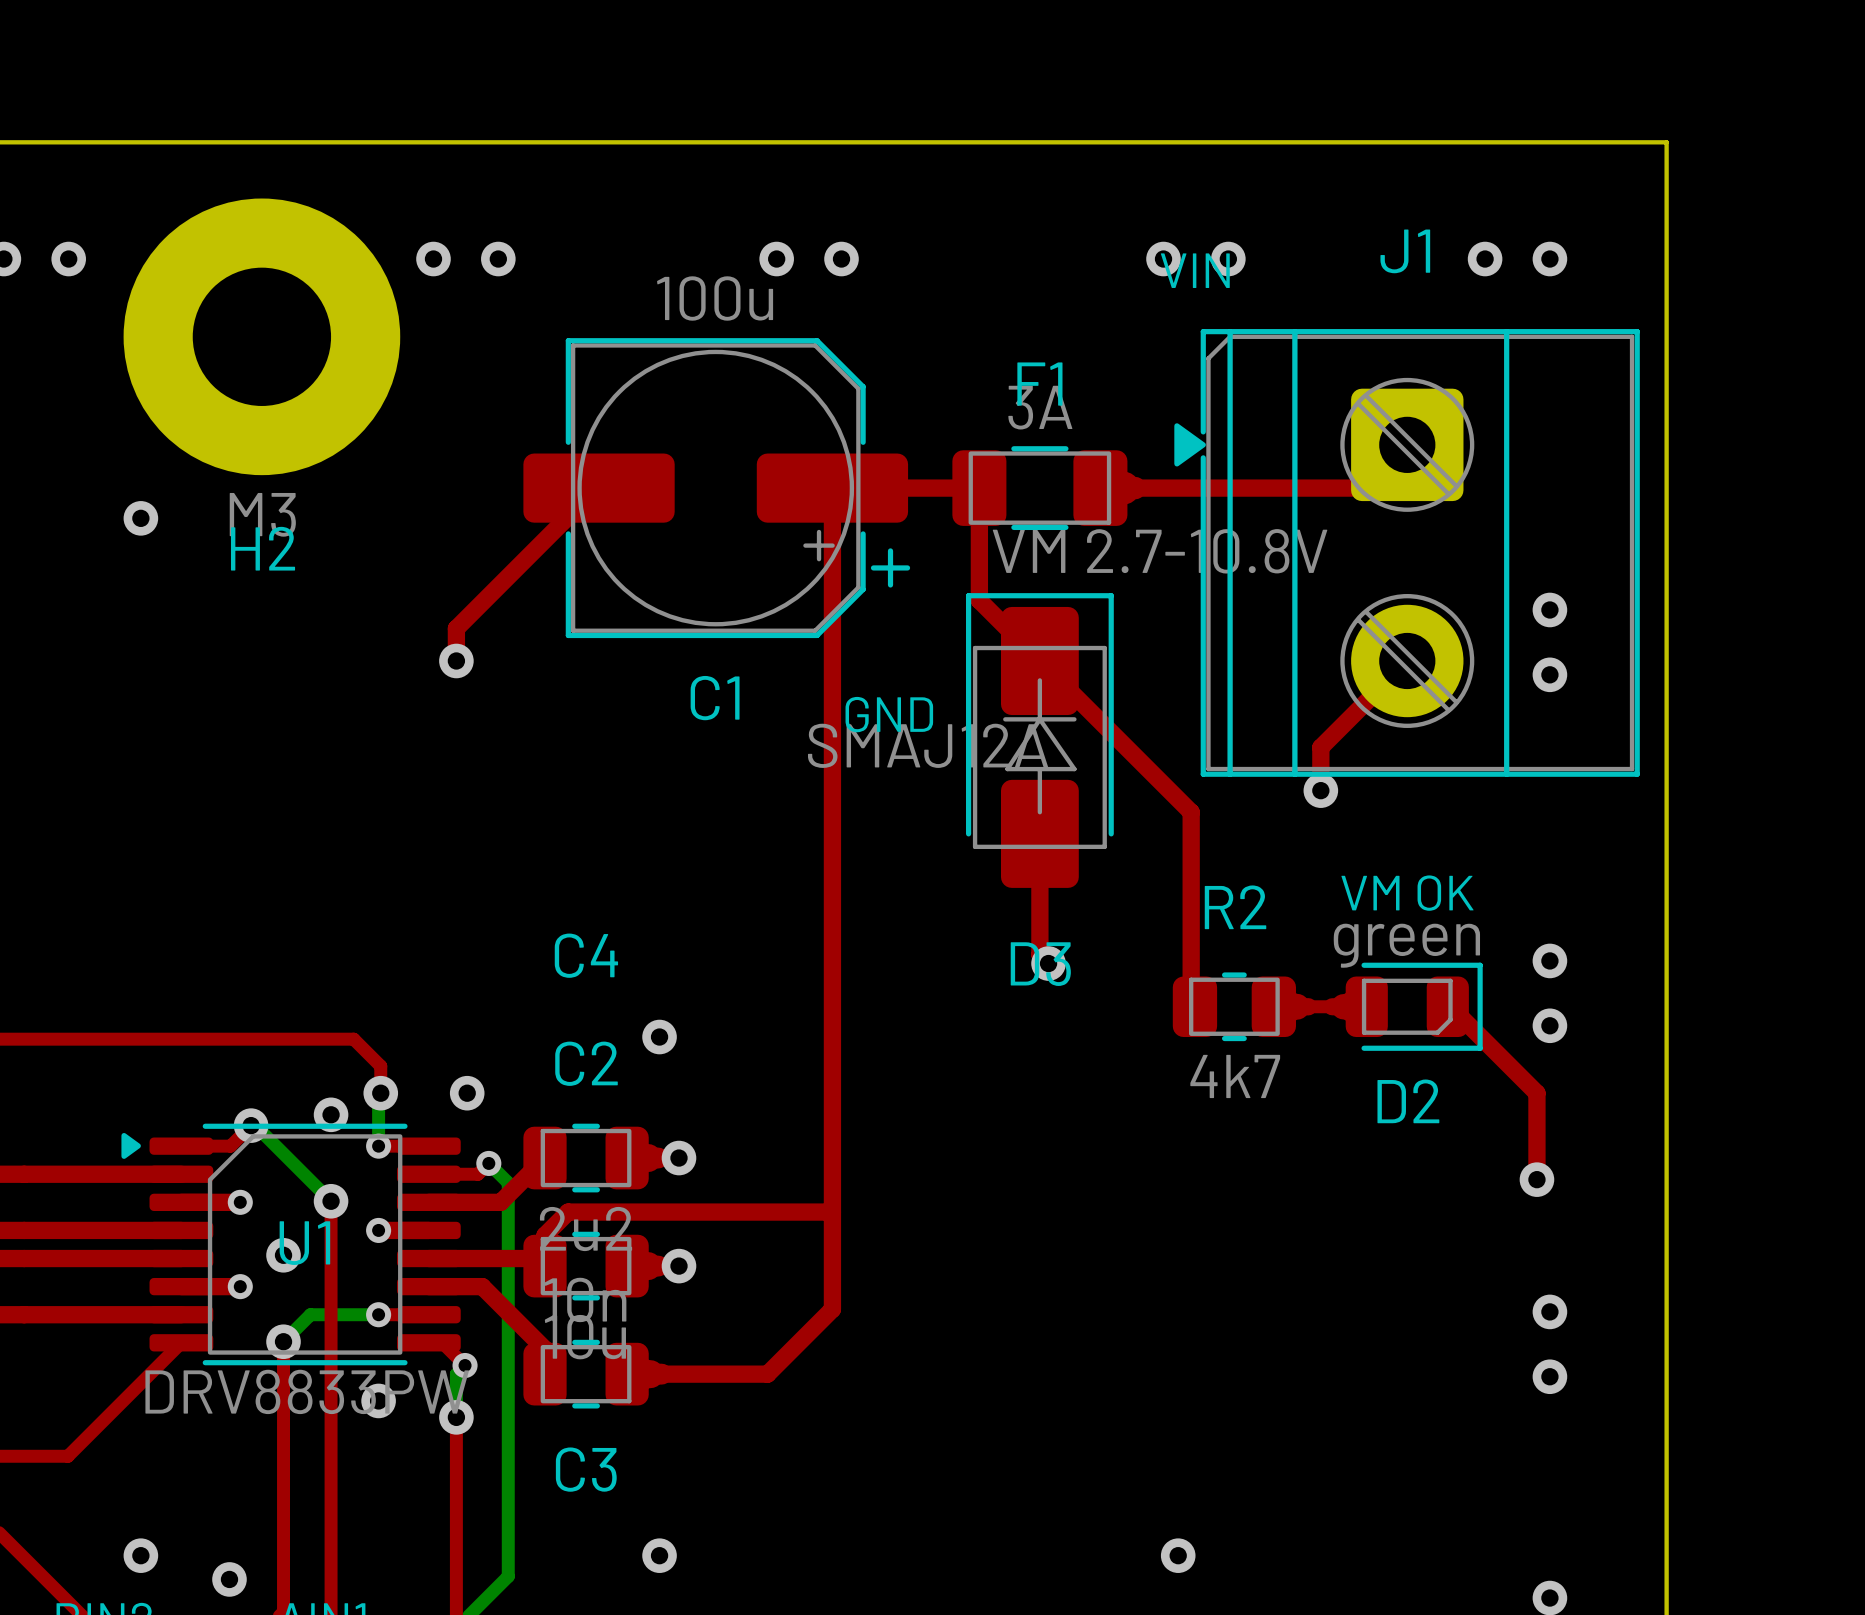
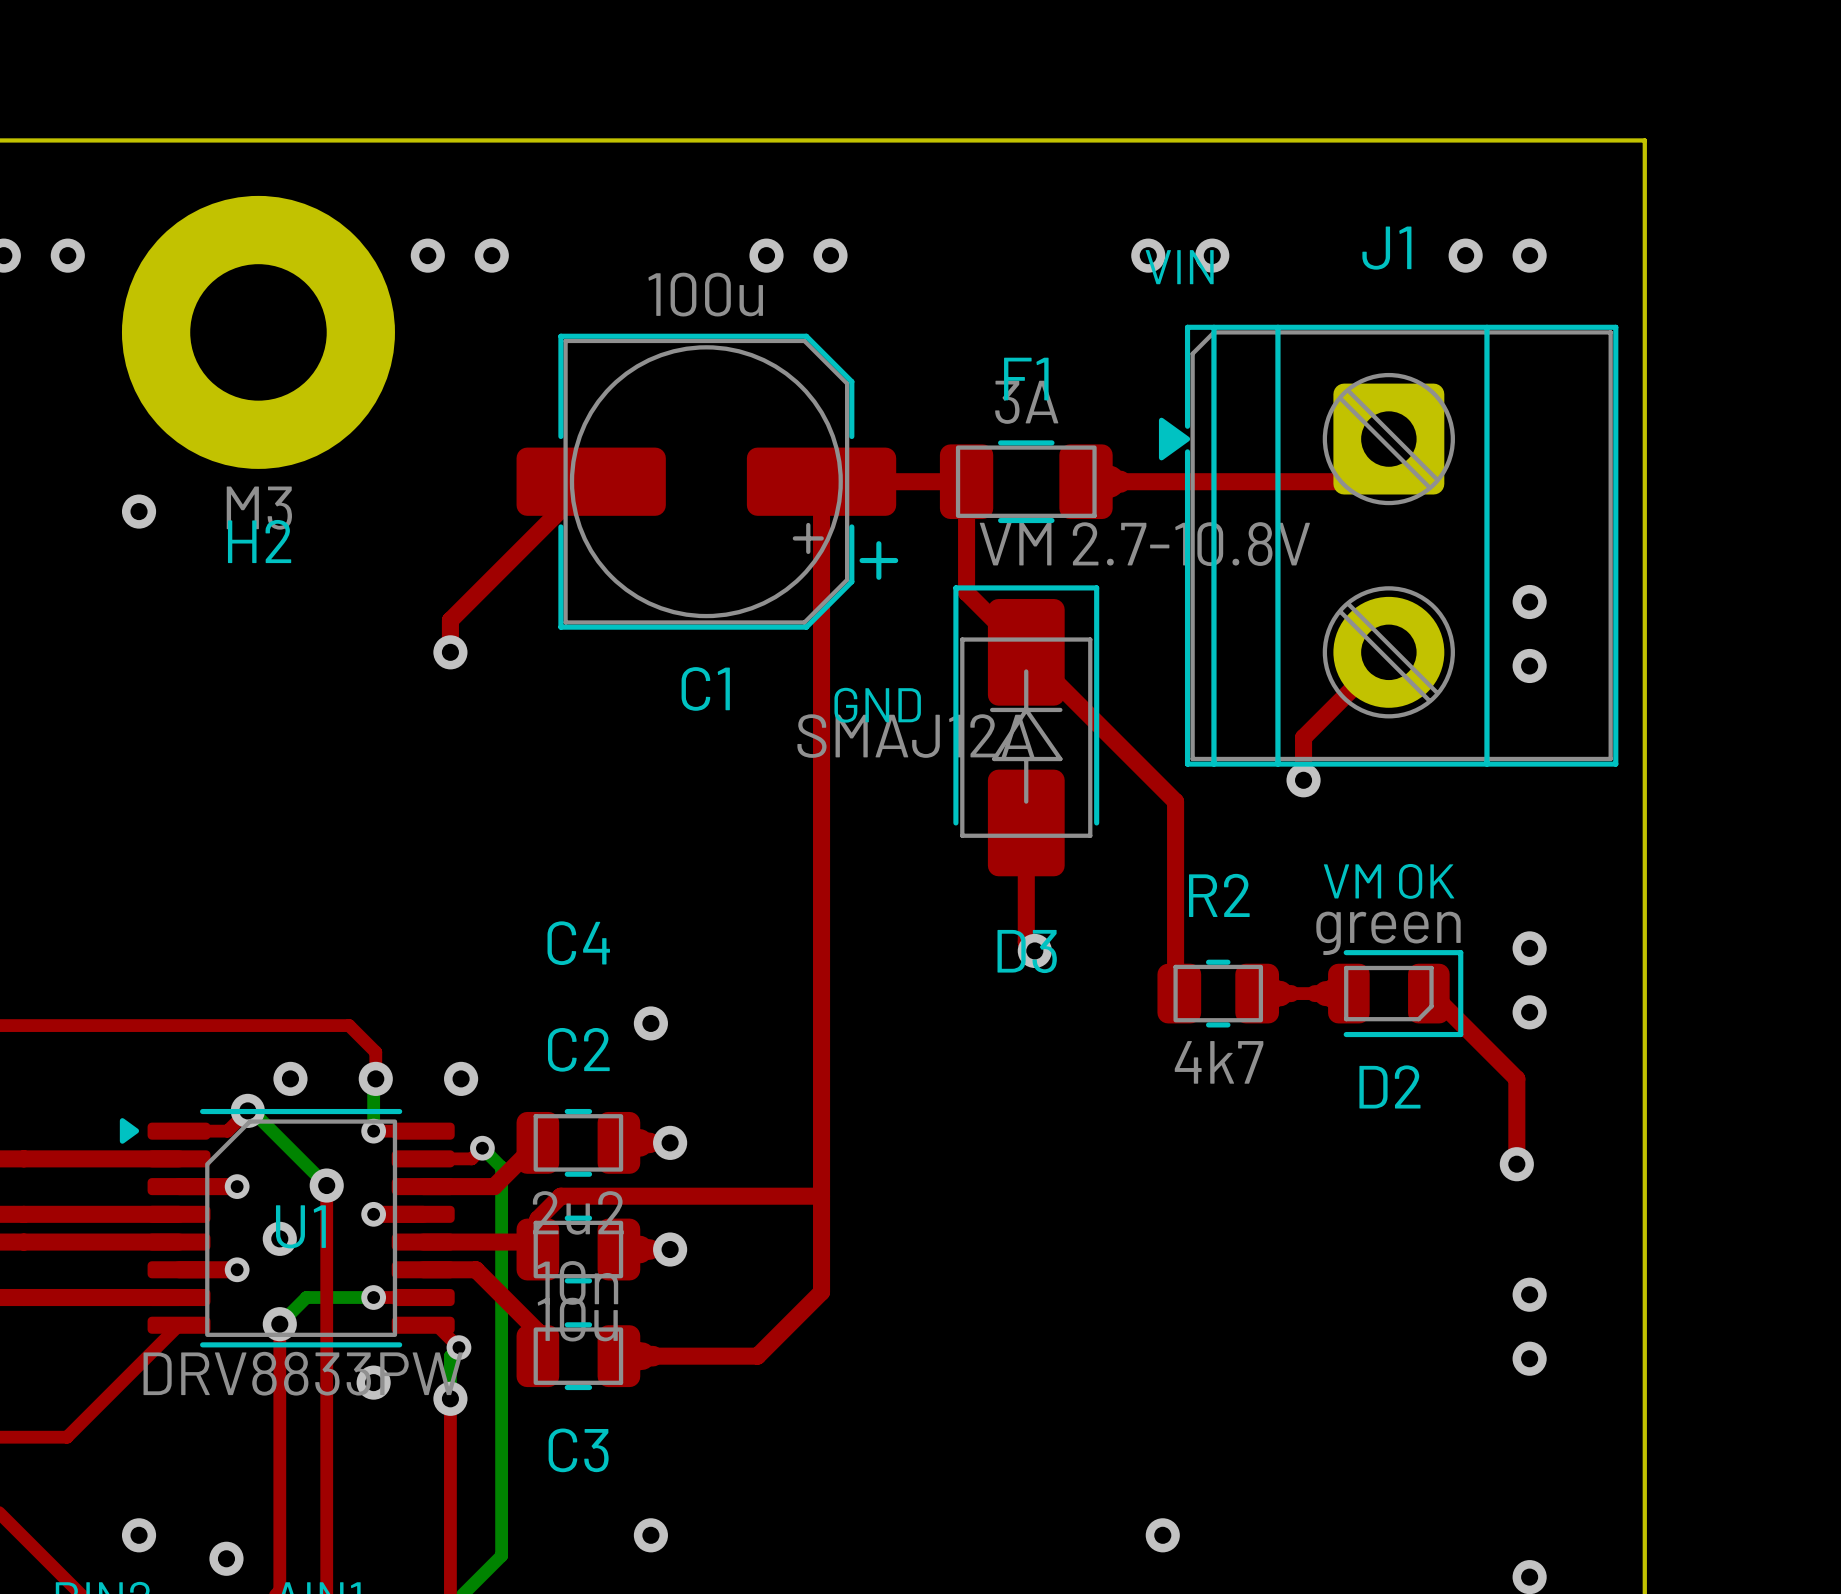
via position: (331, 1114) -> (290, 1078)

